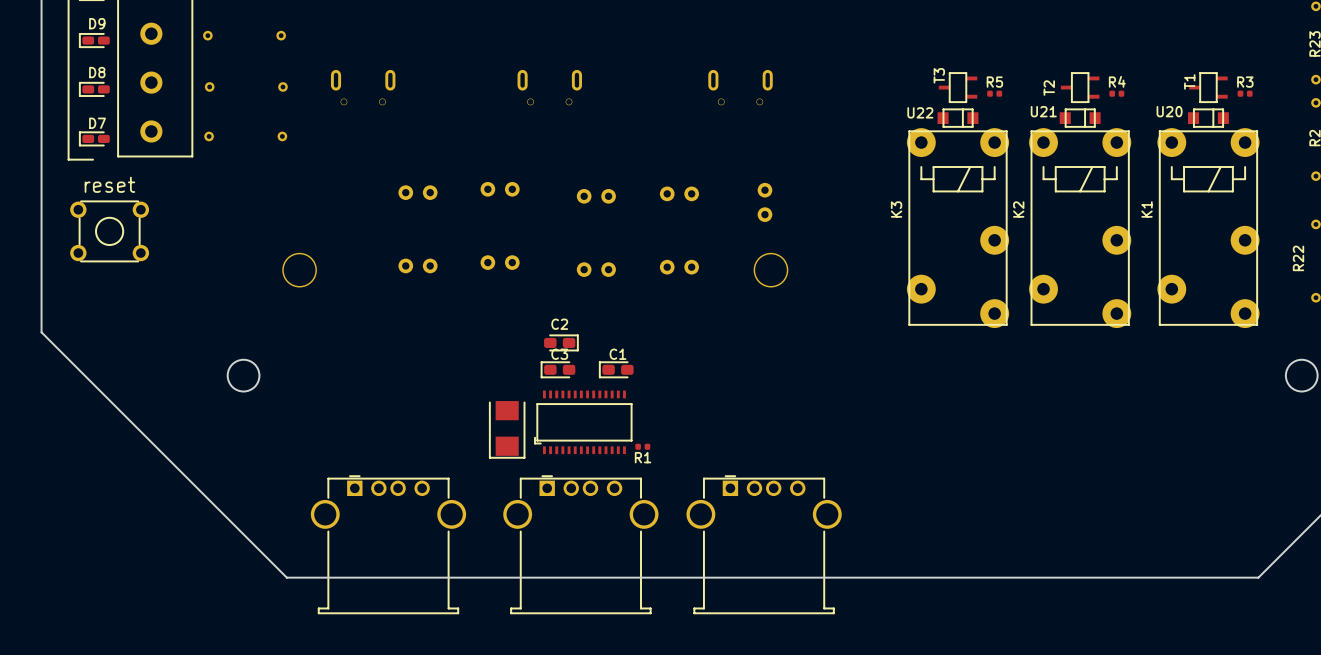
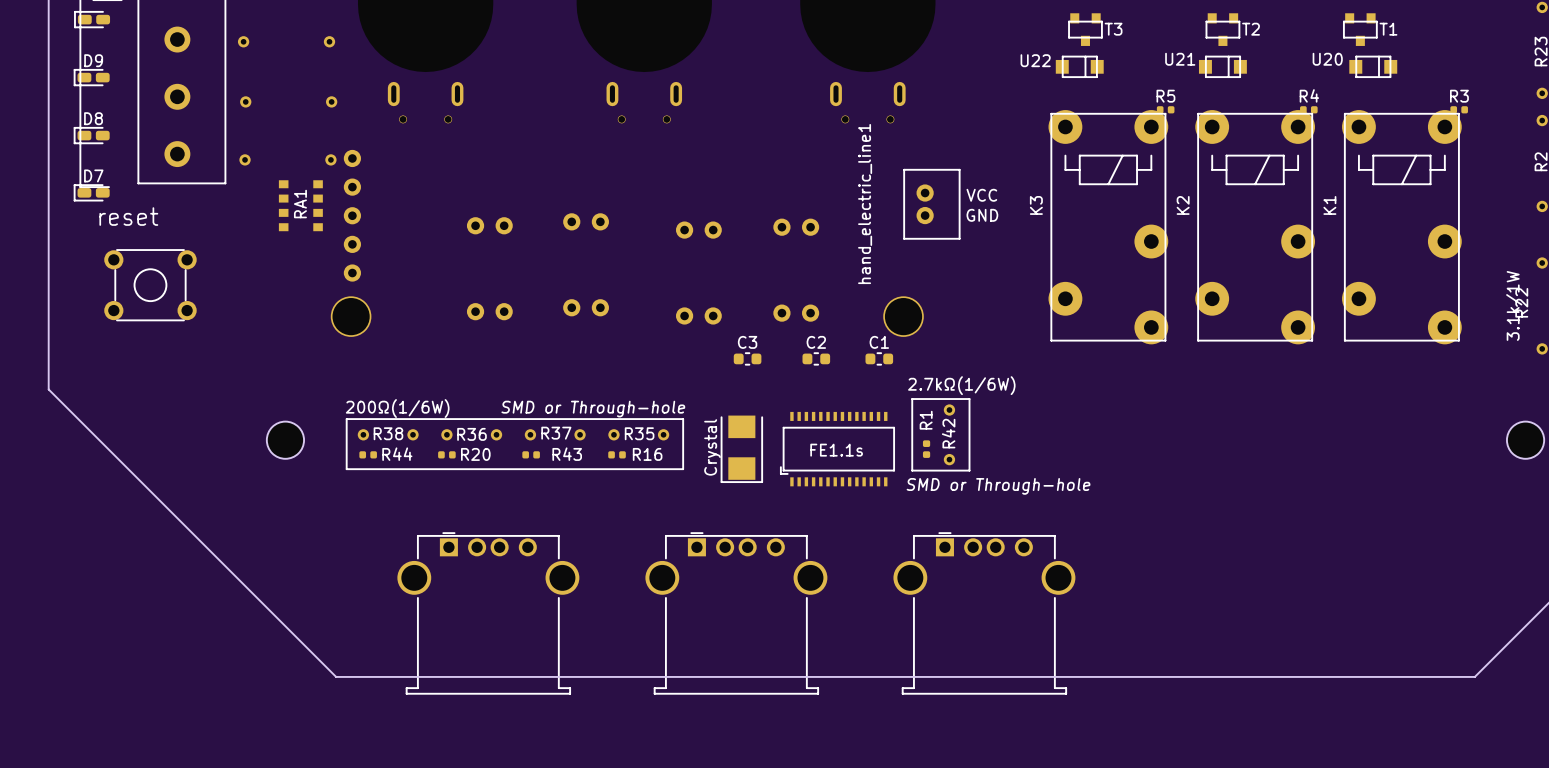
part: none -> (92, 19)
text position: D9 (97, 23) -> D9 (93, 60)
part: (94, 40) -> none
part: none -> (91, 77)
text position: D8 (97, 72) -> D8 (93, 118)
T3 footprint: [938, 72, 978, 103] -> [1068, 13, 1103, 46]
T2 footprint: [1060, 72, 1100, 103] -> [1205, 13, 1241, 46]
T1 footprint: [1189, 72, 1228, 103] -> [1343, 13, 1378, 46]
T3 name position: T3 (939, 75) -> T3 (1113, 29)
T1 name position: T1 (1189, 81) -> T1 (1388, 29)
T2 name position: T2 (1049, 88) -> T2 (1251, 29)
part: (94, 89) -> none
part: none -> (91, 135)
U22 position: (958, 118) -> (1079, 66)
U21 position: (1080, 118) -> (1222, 66)
U20 position: (1208, 118) -> (1373, 66)
text position: D7 (97, 123) -> D7 (93, 175)
part: (94, 138) -> none
part: none -> (91, 192)
text: none -> VCC (981, 195)
hand_electric_line1: none -> (931, 204)
RA1: none -> (300, 205)
text: none -> GND (982, 215)
part: none -> (352, 215)
part: (764, 202) -> none
K3 position: (958, 228) -> (1108, 227)
K2 position: (1080, 228) -> (1255, 227)
K1 position: (1208, 228) -> (1401, 227)
part position: (109, 231) -> (150, 285)
R22 value: none -> 3.1k/1W (1514, 305)
text: none -> 2.7kΩ(1/6W) (961, 385)
C2 footprint: [544, 334, 579, 352] -> [802, 352, 831, 366]
line: none -> (912, 399) (912, 470) (969, 470) (969, 399) (912, 399)
text: none -> 200Ω(1/6W) (397, 408)
text: none -> SMD or Through-hole (593, 409)
line: none -> (346, 419) (346, 469) (683, 469) (683, 419) (346, 419)
C3 footprint: [541, 361, 576, 378] -> [733, 352, 762, 366]
C1 footprint: [599, 361, 634, 378] -> [865, 352, 894, 366]
R38: none -> (388, 434)
R36: none -> (471, 434)
R37: none -> (555, 434)
R35: none -> (638, 434)
R42: none -> (949, 434)
part: none -> Crystal (741, 449)
part: none -> FE1.1s (837, 449)
R44: none -> (368, 454)
R20: none -> (446, 454)
R43: none -> (531, 454)
R16: none -> (617, 454)
text: none -> SMD or Through-hole (998, 486)
part: (583, 422) -> none
part: (507, 429) -> none
R1 rotation: 0° (642, 446) -> 90° clockwise (926, 449)
R1 position: (642, 446) -> (926, 449)
R1 name position: R1 (643, 457) -> R1 (926, 420)
part: none -> (984, 613)
part position: (388, 544) -> (488, 613)
part position: (580, 544) -> (736, 613)
part: (764, 544) -> none

